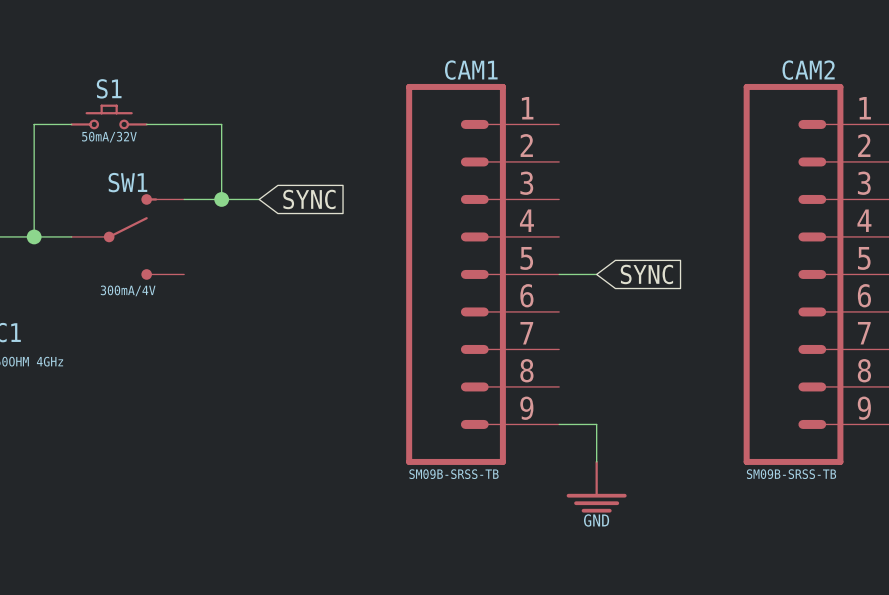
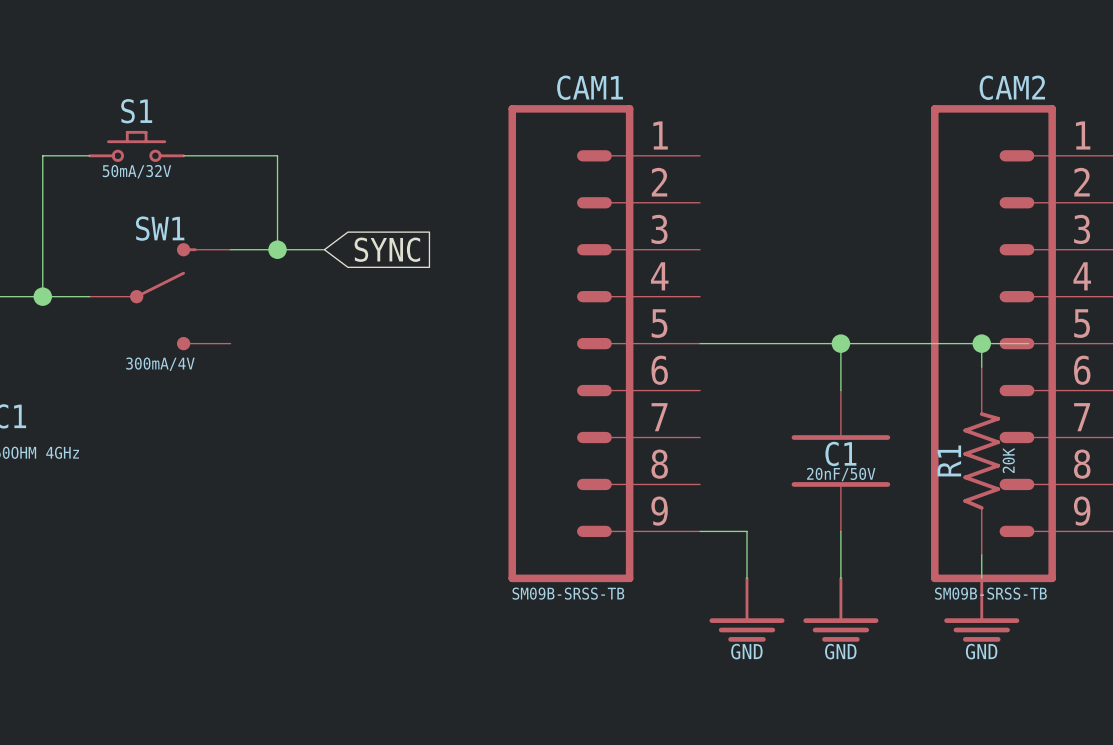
wire: none -> (747, 343) (1028, 343)
global label: SYNC (646, 274) -> none
wire: none -> (840, 343) (840, 390)
junction: none -> (840, 343)
wire: none -> (981, 343) (981, 367)
junction: none -> (981, 343)
C1: none -> 20nF/50V (840, 460)
R1: none -> 20K (981, 460)
wire: none -> (840, 531) (840, 578)
wire: none -> (981, 554) (981, 578)
power symbol: none -> (840, 609)
power symbol: none -> (981, 609)

